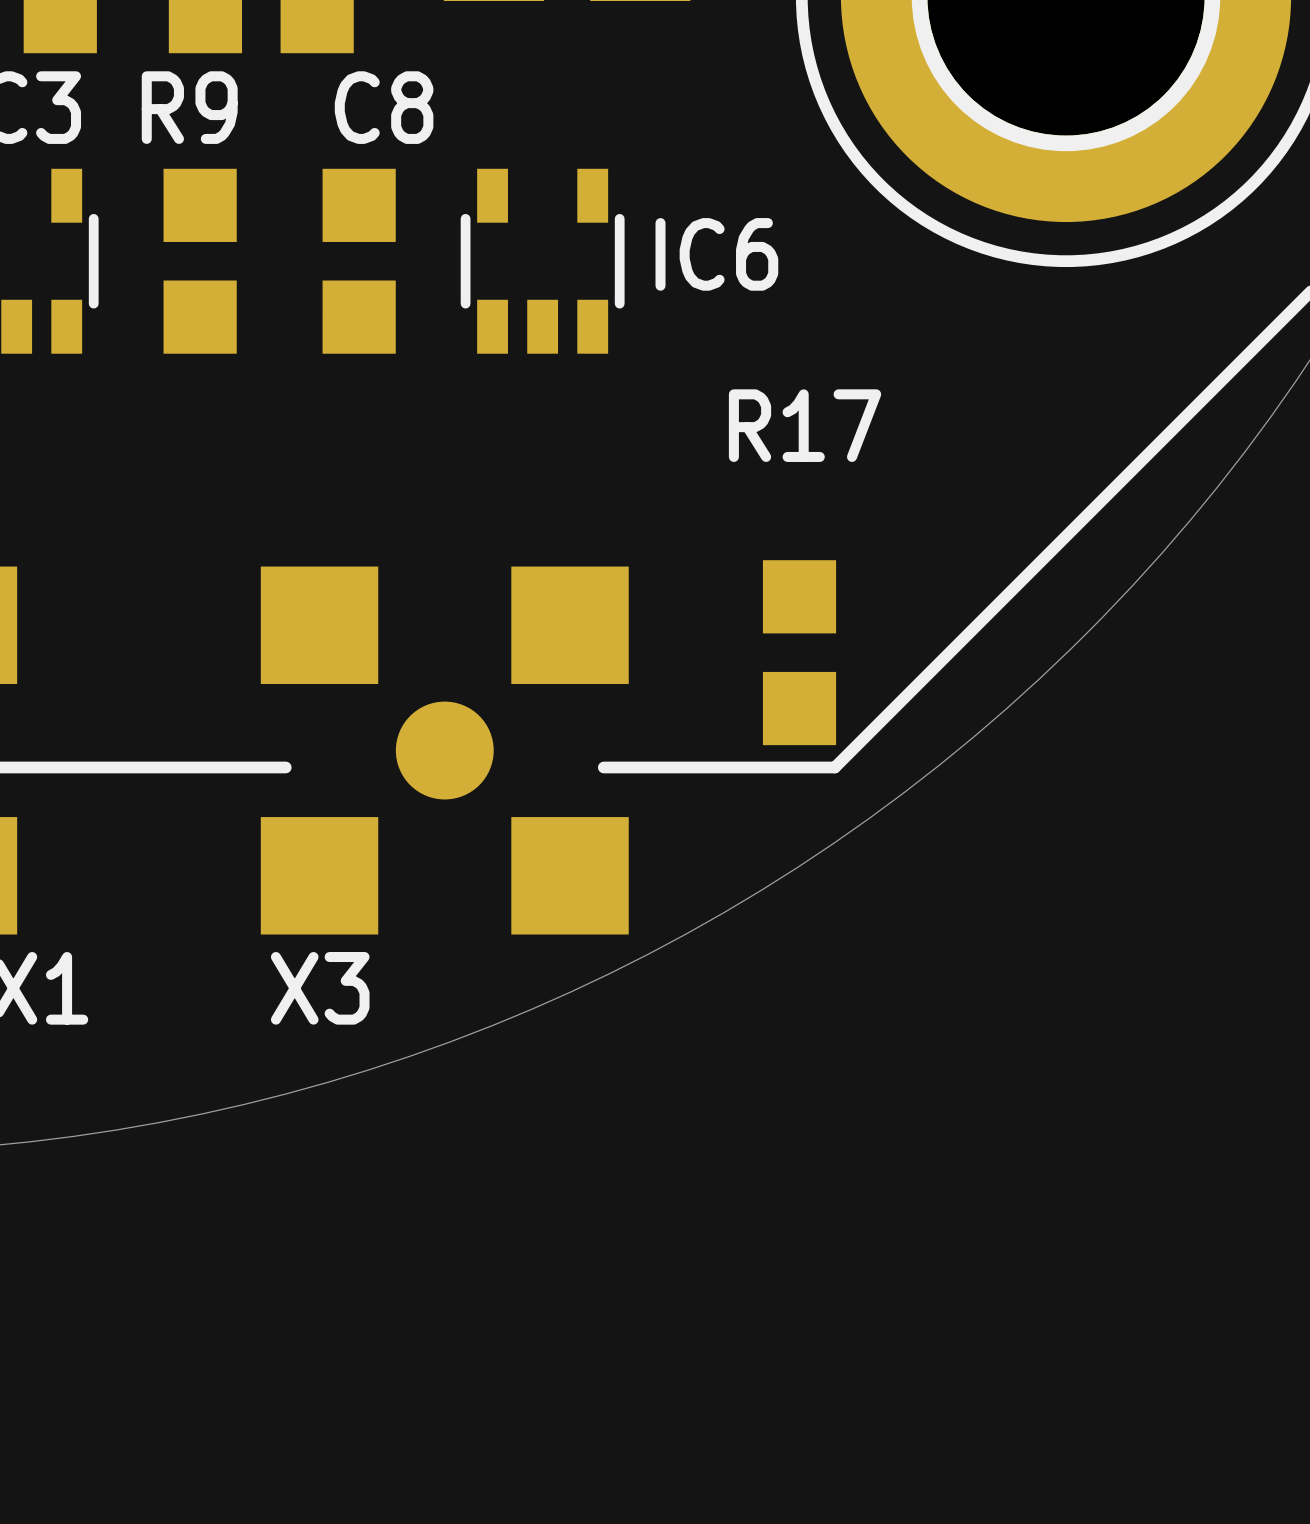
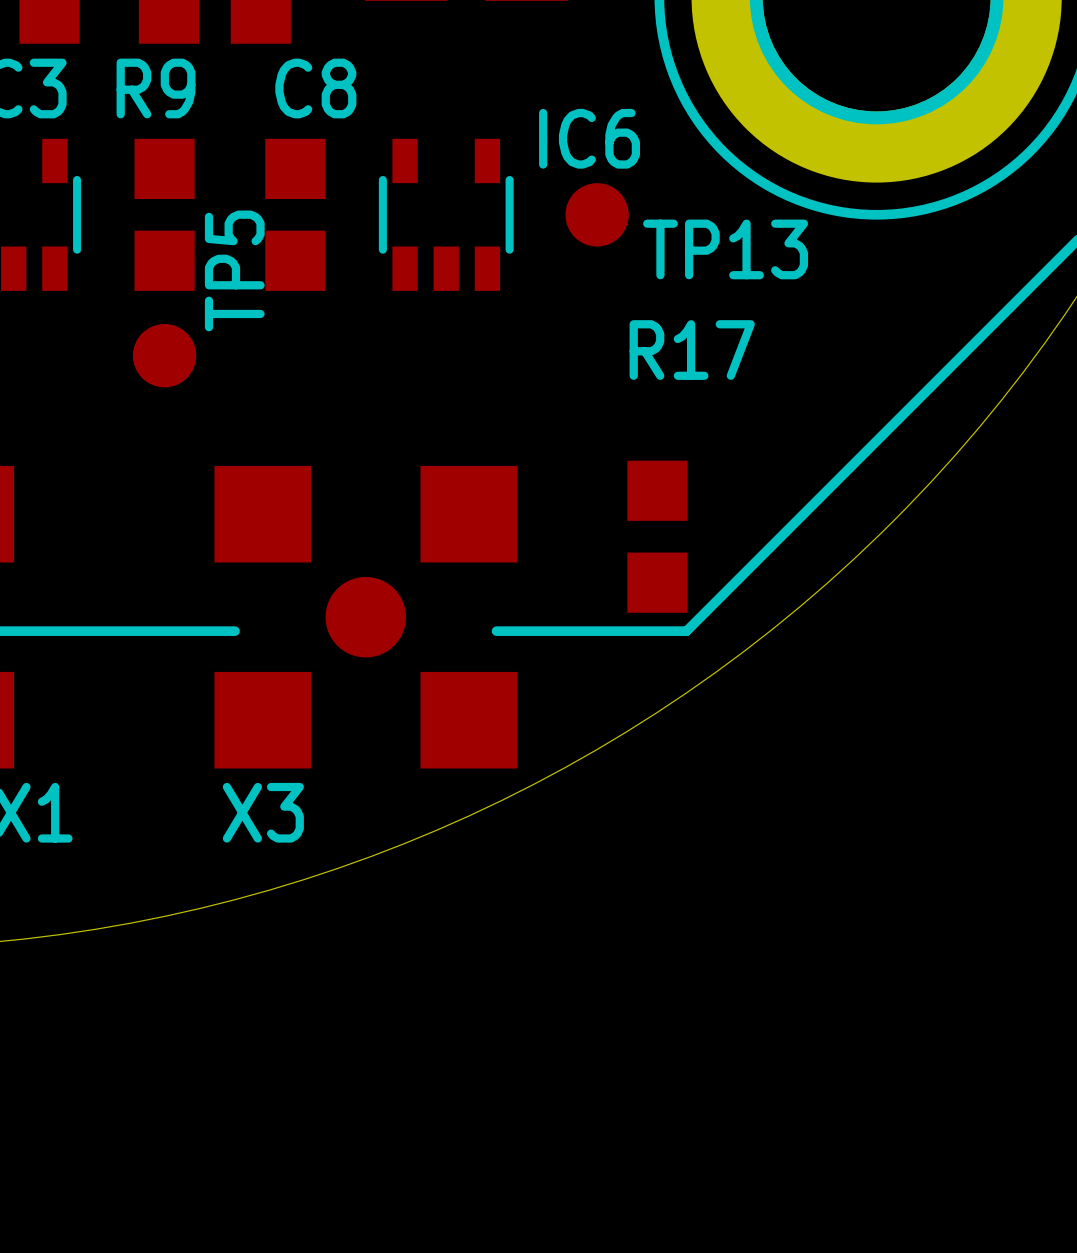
IC6 name position: IC6 (716, 254) -> IC6 (589, 138)
TP13: none -> (597, 214)
R17 name position: R17 (805, 425) -> R17 (692, 350)
TP5: none -> (164, 355)

